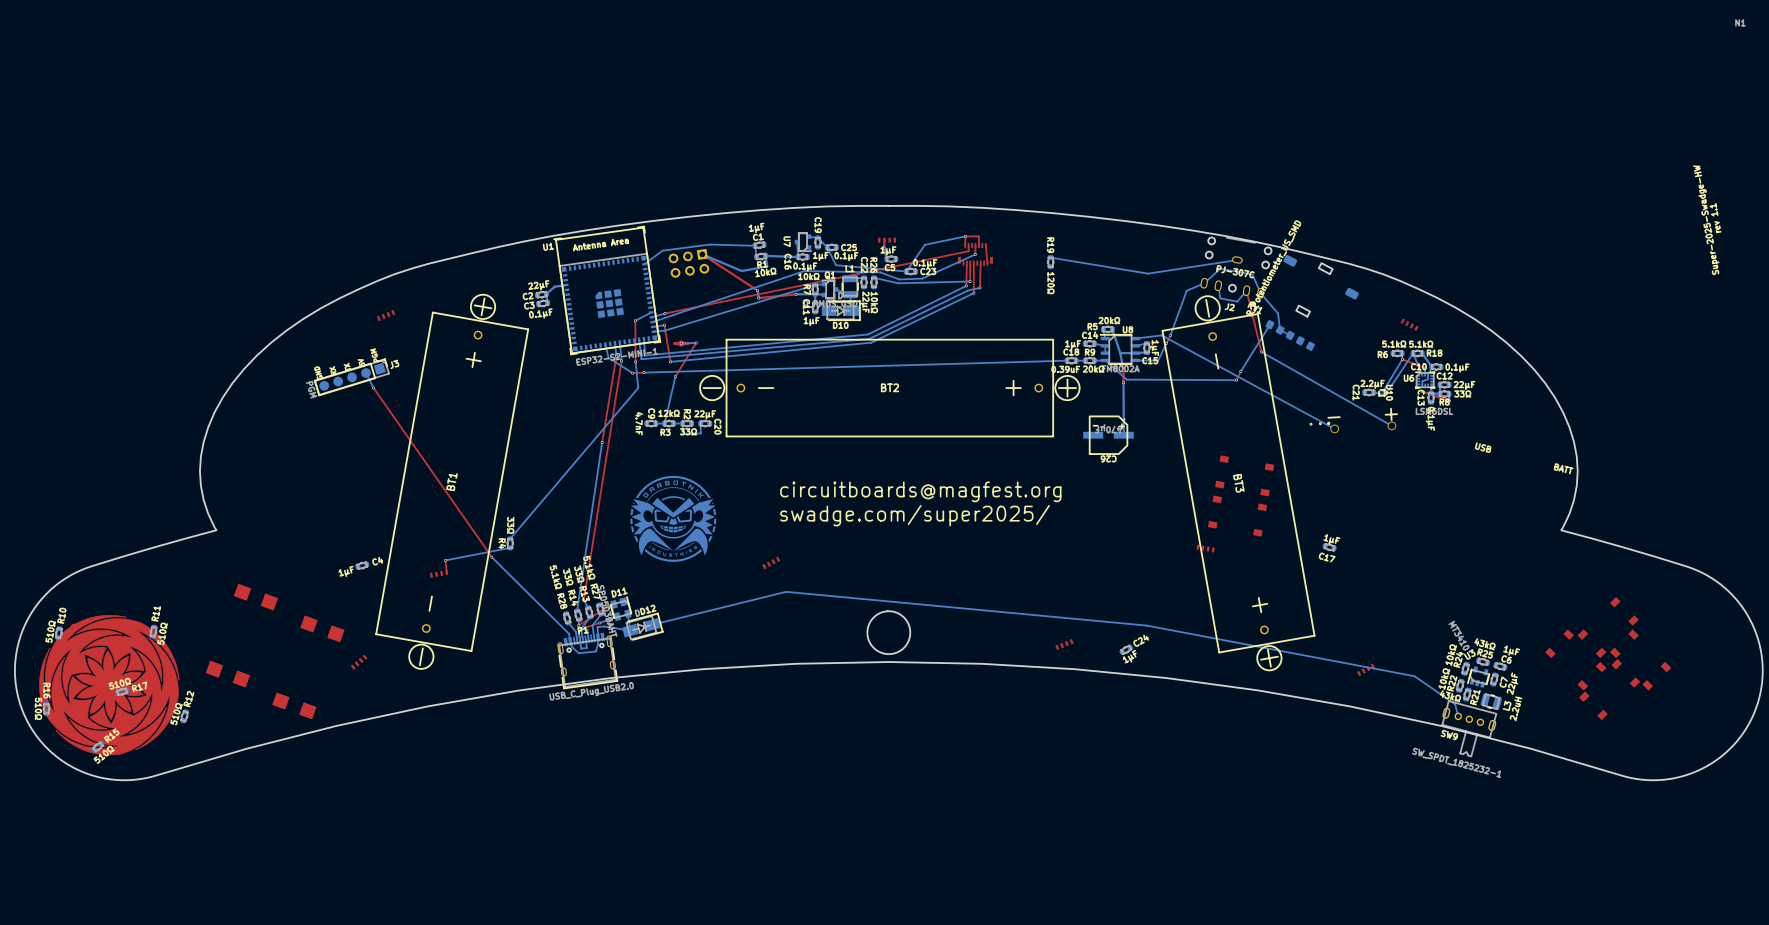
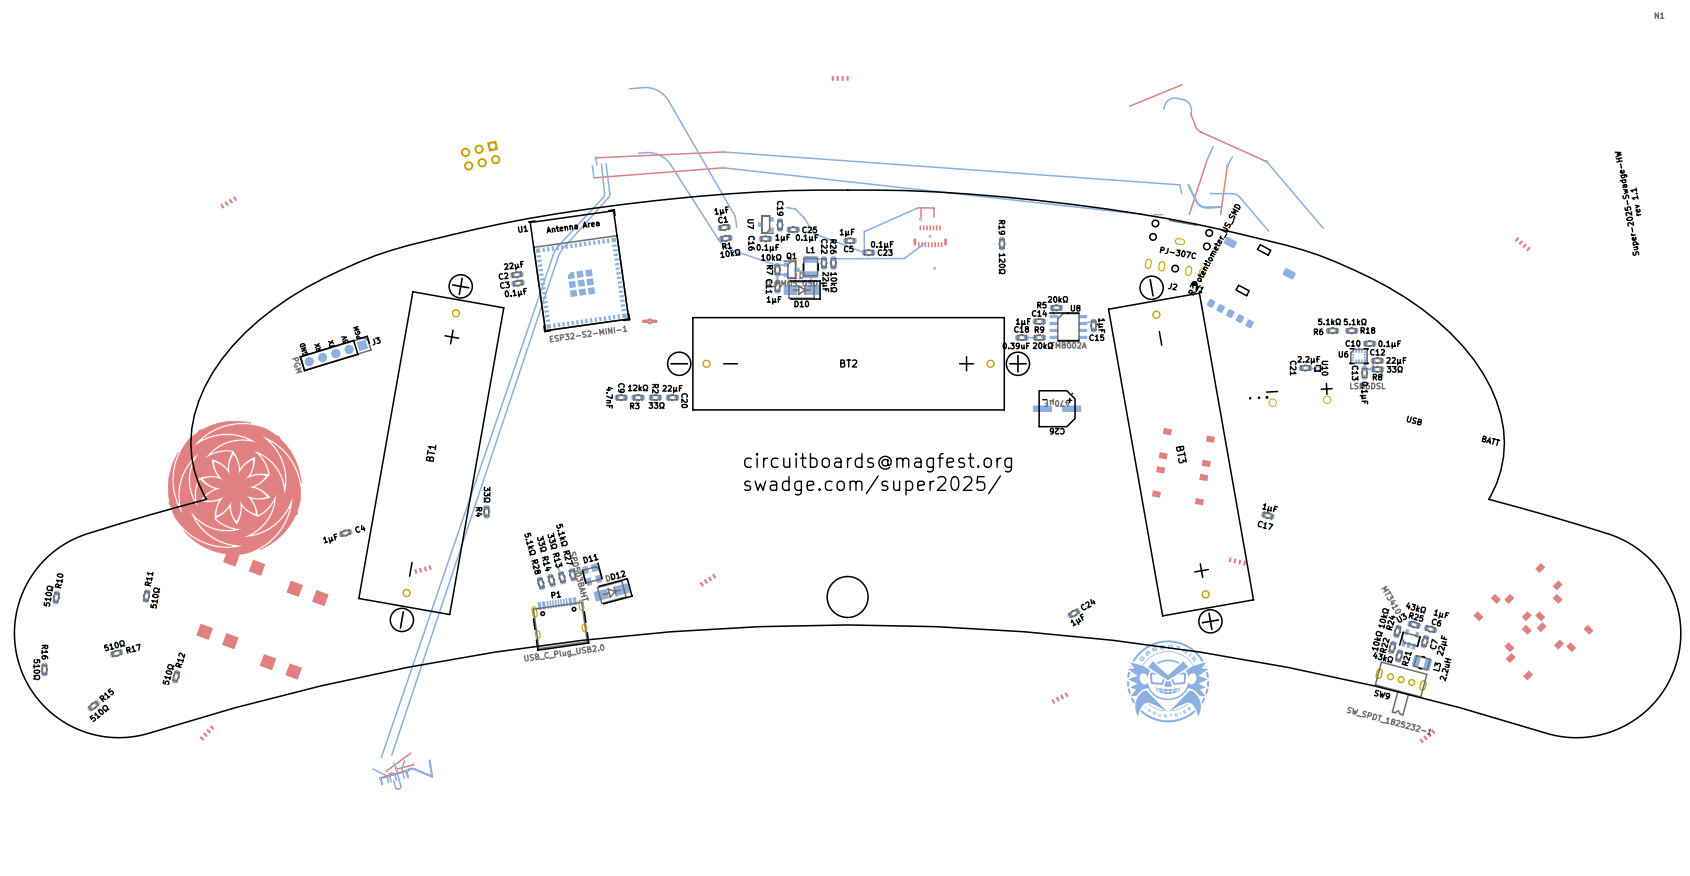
part: none -> (840, 78)
top track: none -> (1182, 84) (1129, 106)
bottom track: none -> (629, 88) (651, 88) (660, 92) (667, 98) (735, 216) (736, 227)
bottom track: none -> (1163, 109) (1167, 101) (1177, 98) (1189, 103) (1190, 114)
top track: none -> (1190, 114) (1196, 127) (1199, 131) (1266, 161)
bottom track: none -> (1213, 146) (1207, 160)
bottom track: none -> (723, 152) (1179, 184) (1181, 193)
top track: none -> (723, 152) (595, 157)
via: none -> (723, 152)
part: none -> (480, 155)
bottom track: none -> (1232, 156) (1227, 165)
bottom track: none -> (595, 157) (596, 164)
via: none -> (595, 157)
top track: none -> (1207, 160) (1189, 214)
bottom track: none -> (1266, 161) (1323, 228)
via: none -> (1266, 161)
bottom track: none -> (601, 164) (603, 196) (559, 245) (553, 254) (381, 757)
bottom track: none -> (606, 163) (609, 195) (563, 247) (558, 257) (391, 754)
bottom track: none -> (592, 165) (593, 177)
top track: none -> (1227, 165) (1220, 214)
via: none -> (1227, 165)
bottom track: none -> (723, 167) (1145, 214)
top track: none -> (723, 167) (593, 177)
via: none -> (723, 167)
bottom track: none -> (1188, 184) (1200, 205) (1221, 206)
bottom track: none -> (1210, 193) (1237, 195) (1268, 231)
part: none -> (228, 202)
bottom track: none -> (786, 207) (795, 208) (804, 217) (814, 233) (864, 252) (864, 231) (920, 207)
bottom track: none -> (1162, 214) (1153, 214)
top track: none -> (934, 217) (933, 208) (920, 207) (920, 217)
bottom track: (965, 236) (924, 244) (906, 271) (835, 265) (827, 247) (817, 237) (808, 236) -> none
top track: (884, 240) (884, 248) -> none
part: (887, 240) -> none
bottom track: (797, 242) (798, 257) (765, 255) (767, 266) (741, 271) (702, 254) -> none
top track: (968, 245) (968, 251) (665, 313) -> none
top track: (975, 245) (975, 254) -> none
top track: (978, 245) (978, 236) (965, 236) (965, 245) -> none
top track: (985, 245) (987, 263) -> none
bottom track: (884, 248) (886, 259) -> none
via: (884, 248) -> none
top track: (702, 254) (757, 290) -> none
bottom track: (975, 254) (922, 278) (899, 279) (880, 272) (804, 271) (652, 322) -> none
bottom track: (756, 257) (755, 245) (710, 244) (662, 250) (644, 264) -> none
bottom track: (1050, 257) (1148, 273) (1237, 260) -> none
part: none -> (1522, 244)
part: (688, 263) -> none
top track: (966, 263) (966, 285) -> none
top track: (970, 263) (970, 281) -> none
top track: (973, 263) (973, 293) -> none
top track: (980, 263) (980, 287) -> none
bottom track: (874, 277) (898, 283) (970, 281) -> (833, 258) (904, 258) (925, 242)
via: (970, 281) -> none
bottom track: (566, 285) (554, 286) (546, 294) (547, 302) -> none
bottom track: (815, 285) (664, 330) (653, 331) -> (777, 265) (724, 245) (667, 160) (654, 153) (638, 153)
bottom track: (966, 285) (867, 334) (645, 355) (643, 339) -> none
via: (966, 285) -> none
bottom track: (1218, 285) (1220, 298) (1237, 301) (1246, 290) -> none
bottom track: (980, 287) (967, 290) (869, 338) (641, 359) (639, 339) -> none
bottom track: (757, 290) (758, 298) -> none
via: (757, 290) -> none
top track: (1246, 290) (1261, 351) -> none
bottom track: (973, 293) (871, 342) (670, 361) -> none
via: (973, 293) -> none
top track: (796, 294) (758, 298) -> none
via: (796, 294) -> none
bottom track: (815, 294) (796, 294) -> none
via: (758, 298) -> none
bottom track: (651, 312) (635, 320) -> none
bottom track: (665, 313) (651, 317) -> none
via: (665, 313) -> none
part: (386, 315) -> none
top track: (635, 320) (635, 361) -> none
via: (635, 320) -> none
bottom track: (1270, 324) (1240, 371) -> none
part: (1409, 324) -> none
bottom track: (664, 325) (653, 326) -> none
top track: (664, 325) (670, 361) -> none
via: (664, 325) -> none
bottom track: (1112, 329) (1120, 353) -> none
top track: (1170, 335) (1166, 343) -> none
via: (1170, 335) -> none
bottom track: (1290, 335) (1280, 330) (1278, 313) (1260, 293) (1252, 274) (1220, 268) (1204, 283) (1186, 290) (1170, 335) -> none
bottom track: (1135, 338) (1161, 335) (1334, 428) -> none
bottom track: (619, 342) (621, 360) -> none
bottom track: (696, 342) (681, 343) -> none
top track: (696, 342) (675, 376) -> none
via: (696, 342) -> none
bottom track: (615, 343) (616, 356) -> none
bottom track: (1094, 343) (1105, 345) (1105, 353) -> none
bottom track: (1166, 343) (1158, 360) (1135, 360) -> none
via: (1166, 343) -> none
bottom track: (605, 344) (608, 357) (632, 373) -> none
bottom track: (1261, 351) (1391, 425) -> none
via: (1261, 351) -> none
bottom track: (1146, 352) (1120, 353) -> none
bottom track: (1120, 353) (1123, 370) -> none
bottom track: (1402, 353) (1402, 359) (1383, 391) -> none
bottom track: (1422, 353) (1431, 366) (1427, 379) (1422, 381) (1422, 385) -> none
top track: (616, 356) (602, 442) -> none
via: (616, 356) -> none
top track: (1402, 359) (1425, 367) -> none
via: (1402, 359) -> none
top track: (621, 360) (583, 599) -> none
via: (621, 360) -> none
bottom track: (1067, 360) (644, 372) -> none
bottom track: (1094, 360) (1105, 360) (1126, 379) (1236, 380) -> none
bottom track: (635, 361) (638, 388) (510, 538) -> none
via: (635, 361) -> none
via: (670, 361) -> none
top track: (1123, 370) (1123, 382) -> none
top track: (1240, 371) (1236, 380) -> none
via: (1240, 371) -> none
top track: (644, 372) (632, 373) -> none
via: (644, 372) -> none
bottom track: (365, 373) (373, 388) -> none
via: (632, 373) -> none
bottom track: (1422, 374) (1413, 353) (1386, 393) (1383, 393) -> none
bottom track: (675, 376) (664, 423) (655, 423) -> none
via: (675, 376) -> none
via: (1236, 380) -> none
bottom track: (1123, 382) (1123, 435) -> none
via: (1123, 382) -> none
top track: (373, 388) (491, 557) -> none
via: (373, 388) -> none
top track: (1422, 391) (1449, 400) -> none
bottom track: (700, 423) (700, 433) (682, 433) (682, 423) (673, 423) -> none
bottom track: (602, 442) (577, 611) -> none
via: (602, 442) -> none
drawing: [630, 475, 717, 562] -> none
part: none -> (234, 488)
bottom track: (510, 547) (445, 560) -> none
part: (1205, 548) -> none
bottom track: (491, 557) (568, 633) (572, 647) (578, 653) (595, 651) (597, 645) (597, 627) (630, 630) (627, 613) -> none
via: (491, 557) -> none
top track: (445, 560) (446, 572) -> none
via: (445, 560) -> none
part: (771, 562) -> none
part: (439, 573) -> none
part: none -> (1237, 561)
part: none -> (423, 569)
top track: (607, 606) (578, 625) -> none
bottom track: (601, 613) (592, 625) (594, 638) -> none
part: none -> (708, 580)
bottom track: (590, 616) (581, 628) -> none
bottom track: (617, 616) (599, 622) -> none
bottom track: (579, 619) (578, 628) (581, 648) (587, 648) (585, 639) -> none
bottom track: (568, 622) (575, 632) (577, 640) -> none
top track: (599, 622) (581, 628) -> none
via: (599, 622) -> none
bottom track: (652, 624) (786, 591) (1146, 625) (1414, 676) (1455, 704) (1458, 716) -> none
via: (578, 625) -> none
bottom track: (581, 628) (587, 629) (588, 639) -> none
bottom track: (581, 628) (582, 639) -> none
part: (1064, 644) -> none
part: (359, 662) -> none
part: (1365, 669) -> none
drawing: none -> [1127, 640, 1210, 723]
part: (109, 685) -> none
part: none -> (1060, 698)
part: none -> (207, 733)
part: none -> (1427, 736)
top track: none -> (410, 753) (386, 770)
bottom track: none -> (404, 760) (402, 769) (404, 778)
bottom track: none -> (429, 760) (432, 776) (412, 768) (407, 770) (408, 777)
bottom track: none -> (394, 763) (400, 788) (396, 788) (393, 781)
top track: none -> (413, 764) (396, 769)
via: none -> (413, 764)
bottom track: none -> (372, 768) (386, 775) (388, 782)
via: none -> (396, 769)
via: none -> (386, 770)
top track: none -> (407, 770) (380, 778)
via: none -> (407, 770)
bottom track: none -> (380, 778) (382, 784)
via: none -> (380, 778)
bottom track: none -> (396, 780) (394, 774) (391, 773) (389, 773) (391, 781)

